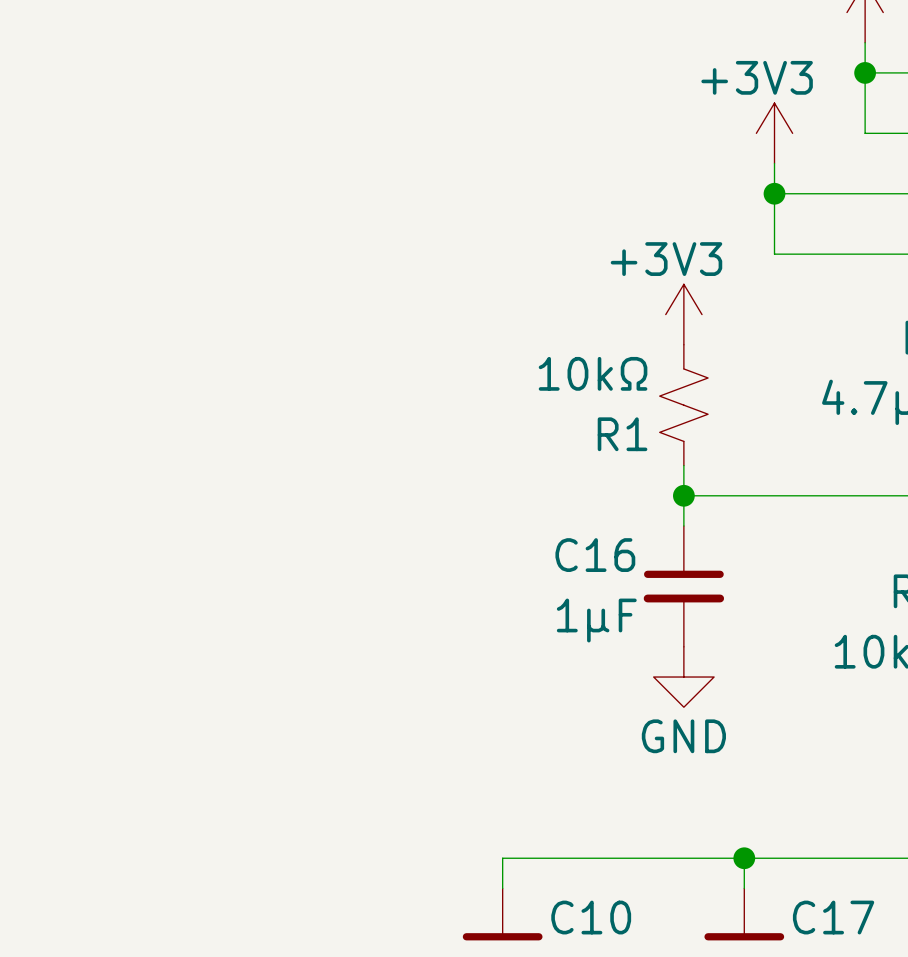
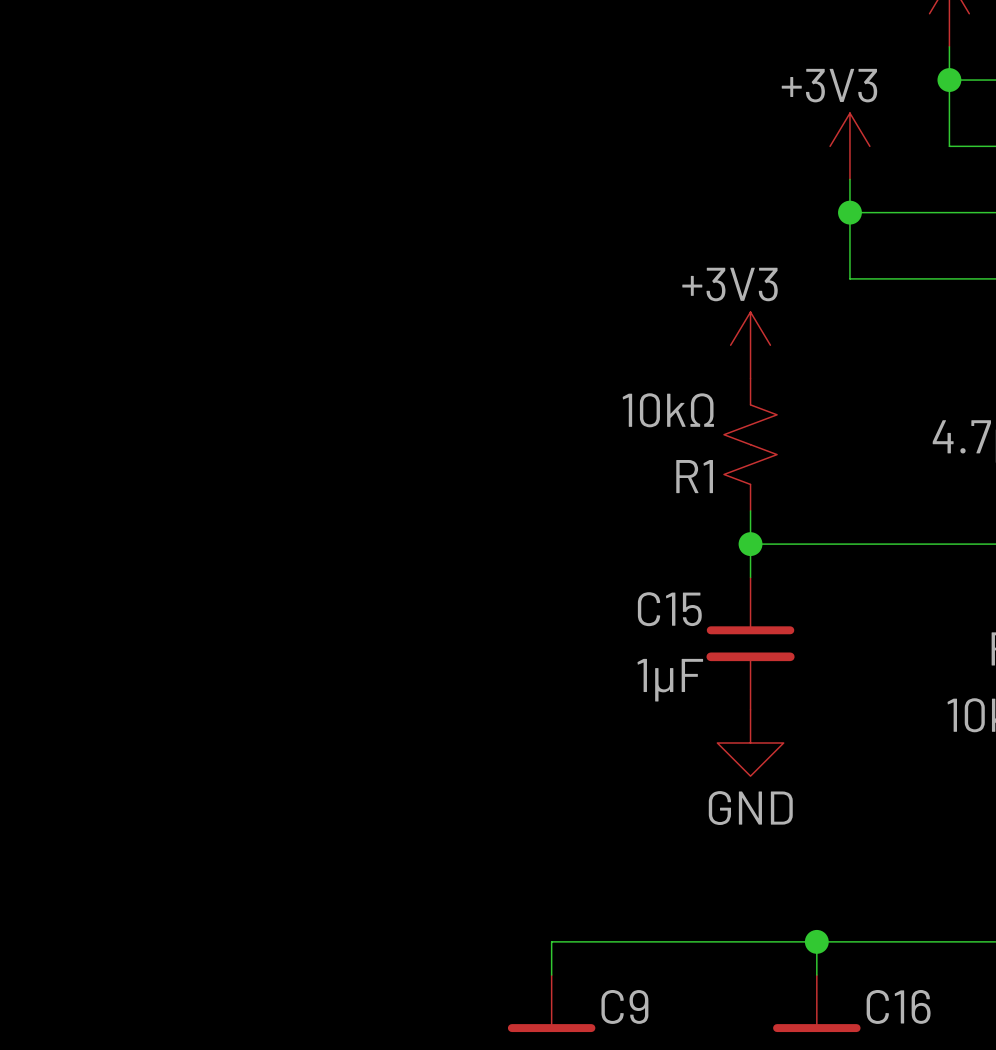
C16 name: C16 (595, 555) -> C15 (669, 609)
C10 name: C10 (591, 917) -> C9 (624, 1006)
C17 name: C17 (833, 917) -> C16 (898, 1006)

